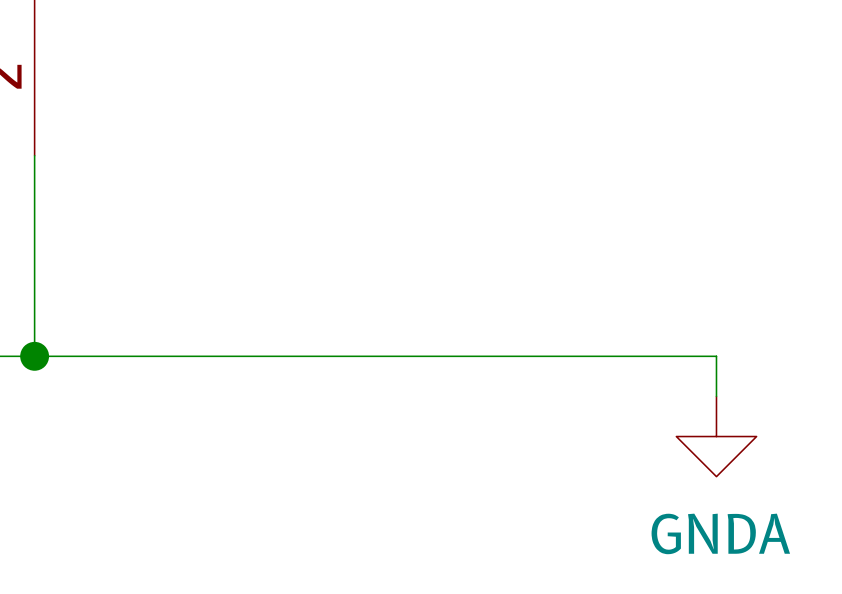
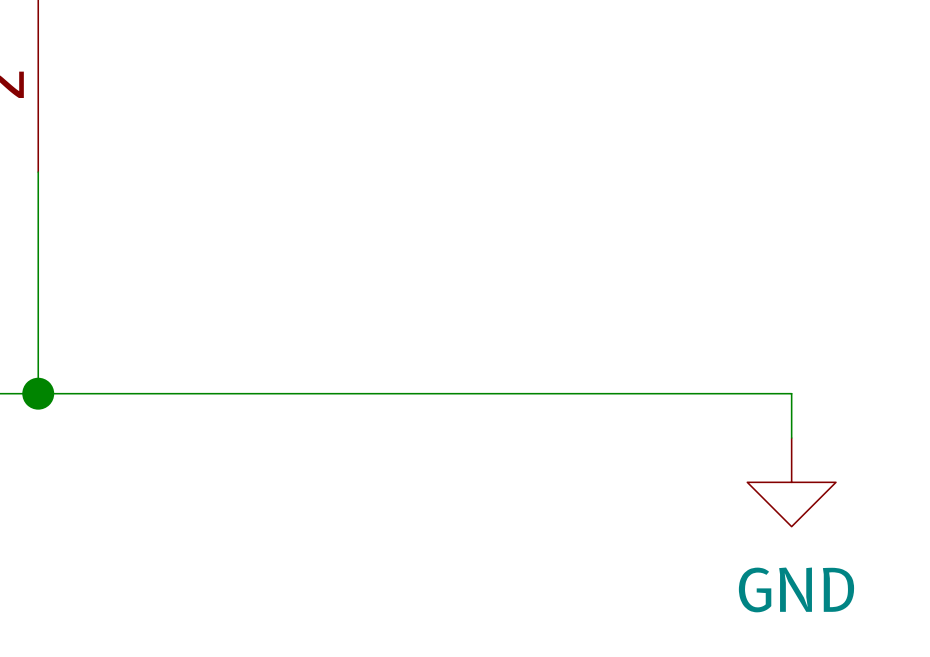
power symbol: GNDA (716, 436) -> GND (791, 482)

